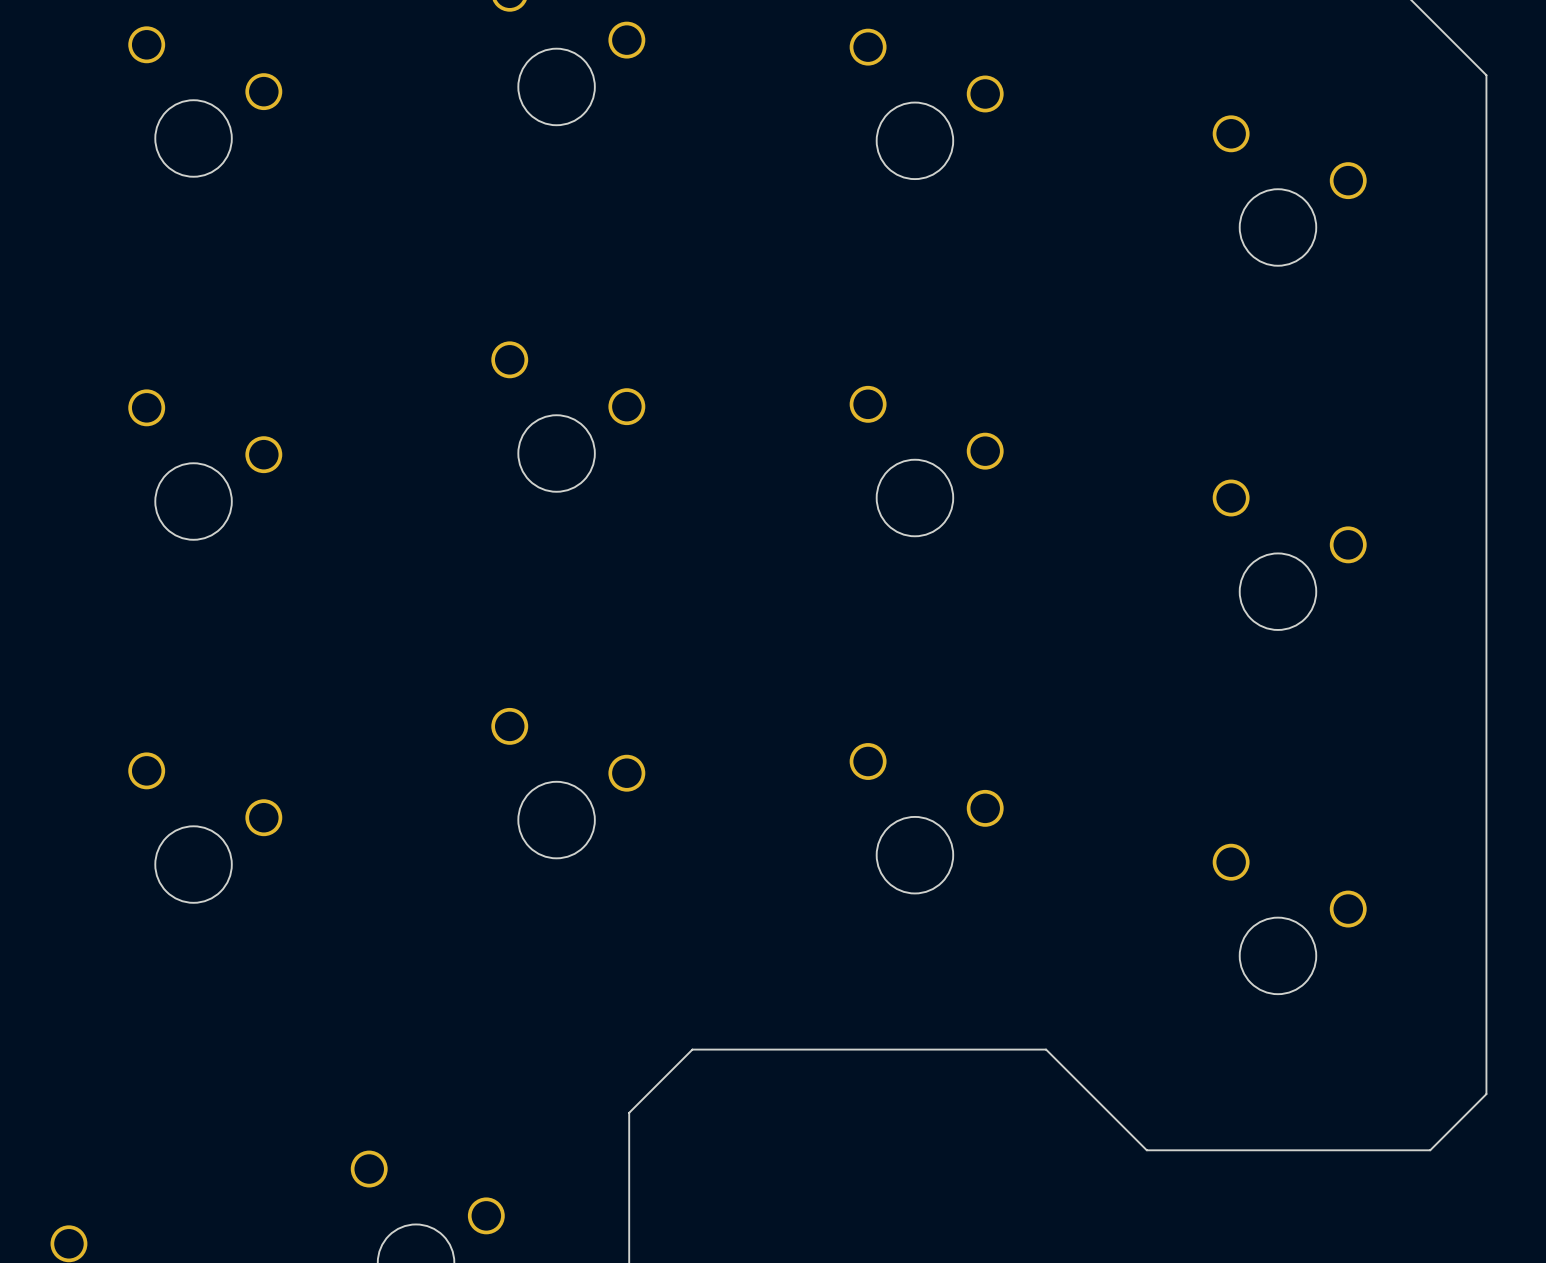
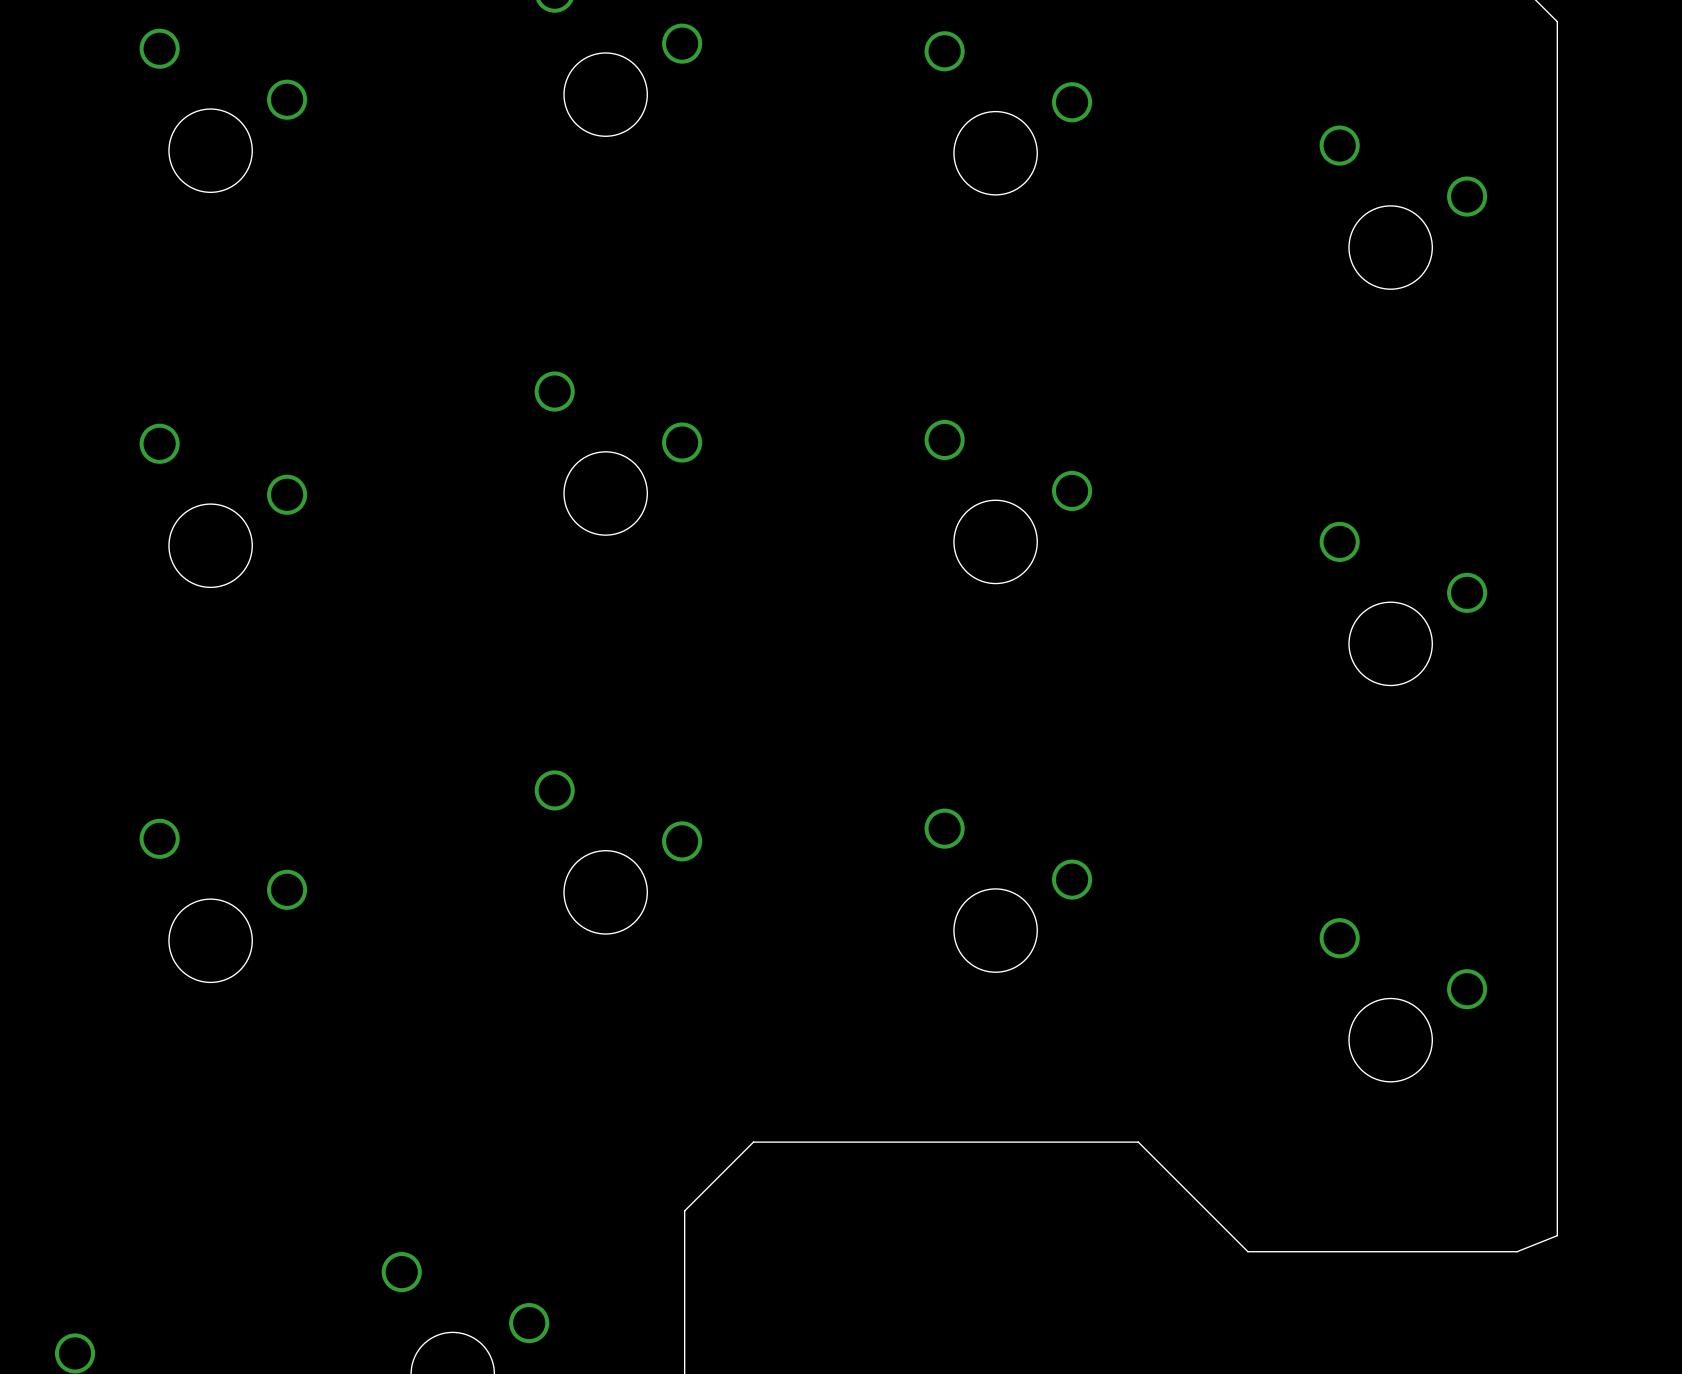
board edge: (1431, 19) (1486, 75) (1486, 1094) (1430, 1150) (1394, 1150) -> (1557, 21) (1557, 1235) (1517, 1251)

